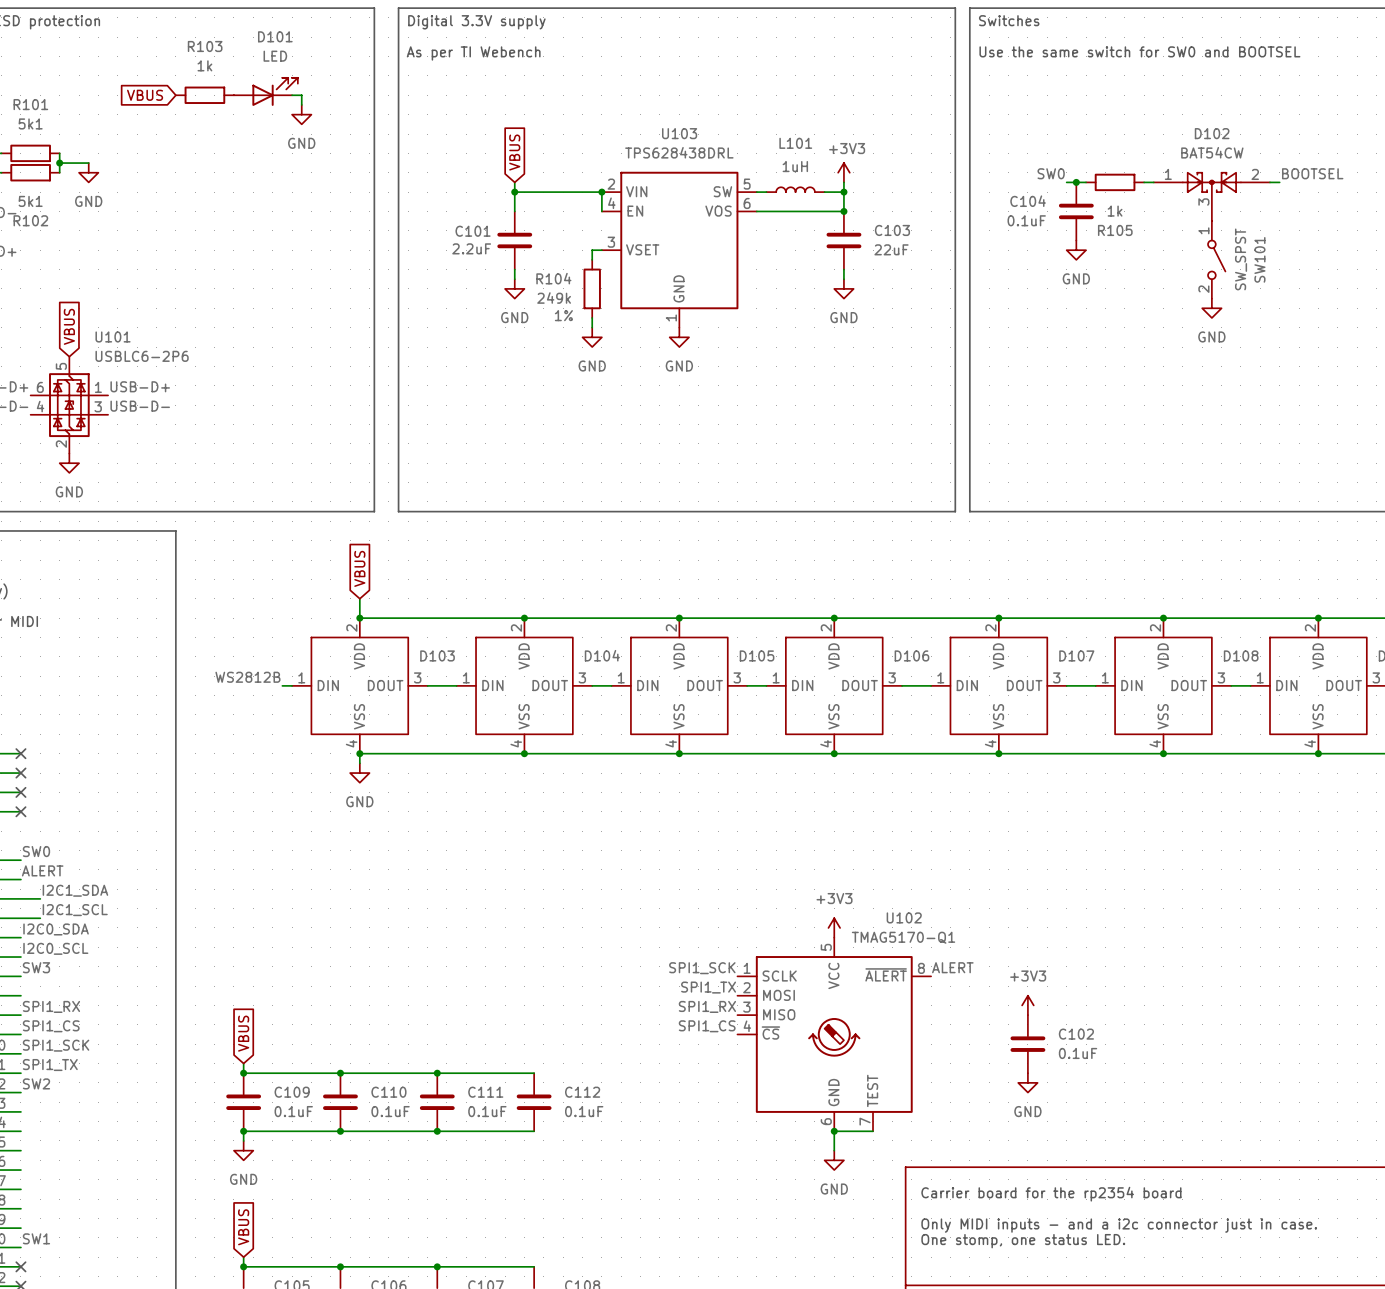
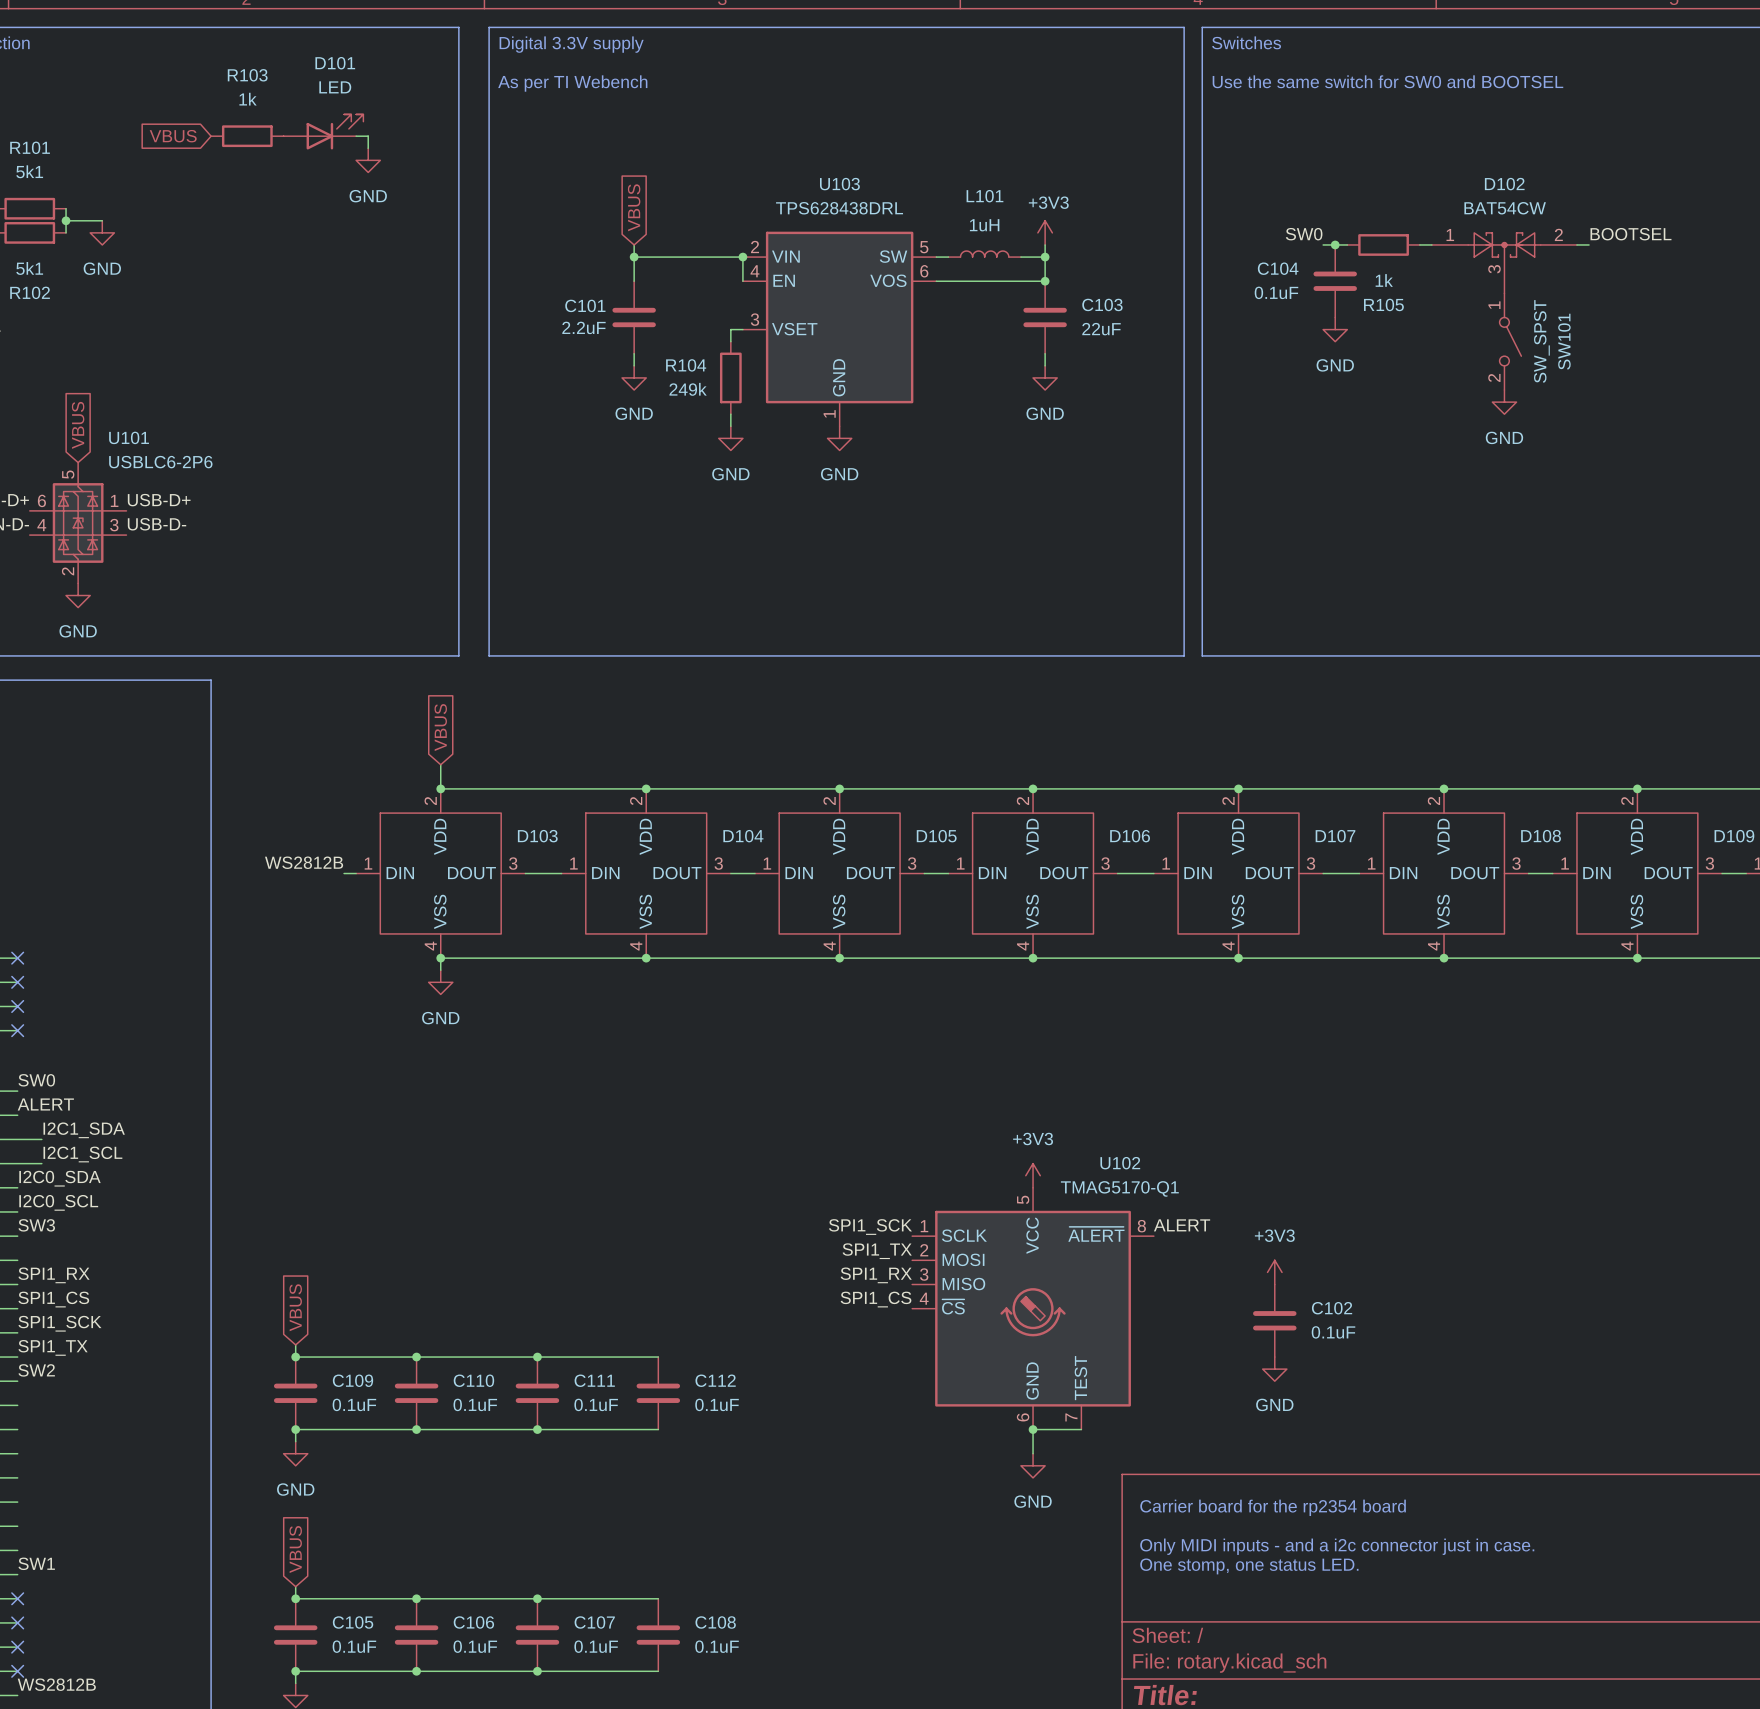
R104 text: 1% (563, 315) -> none

